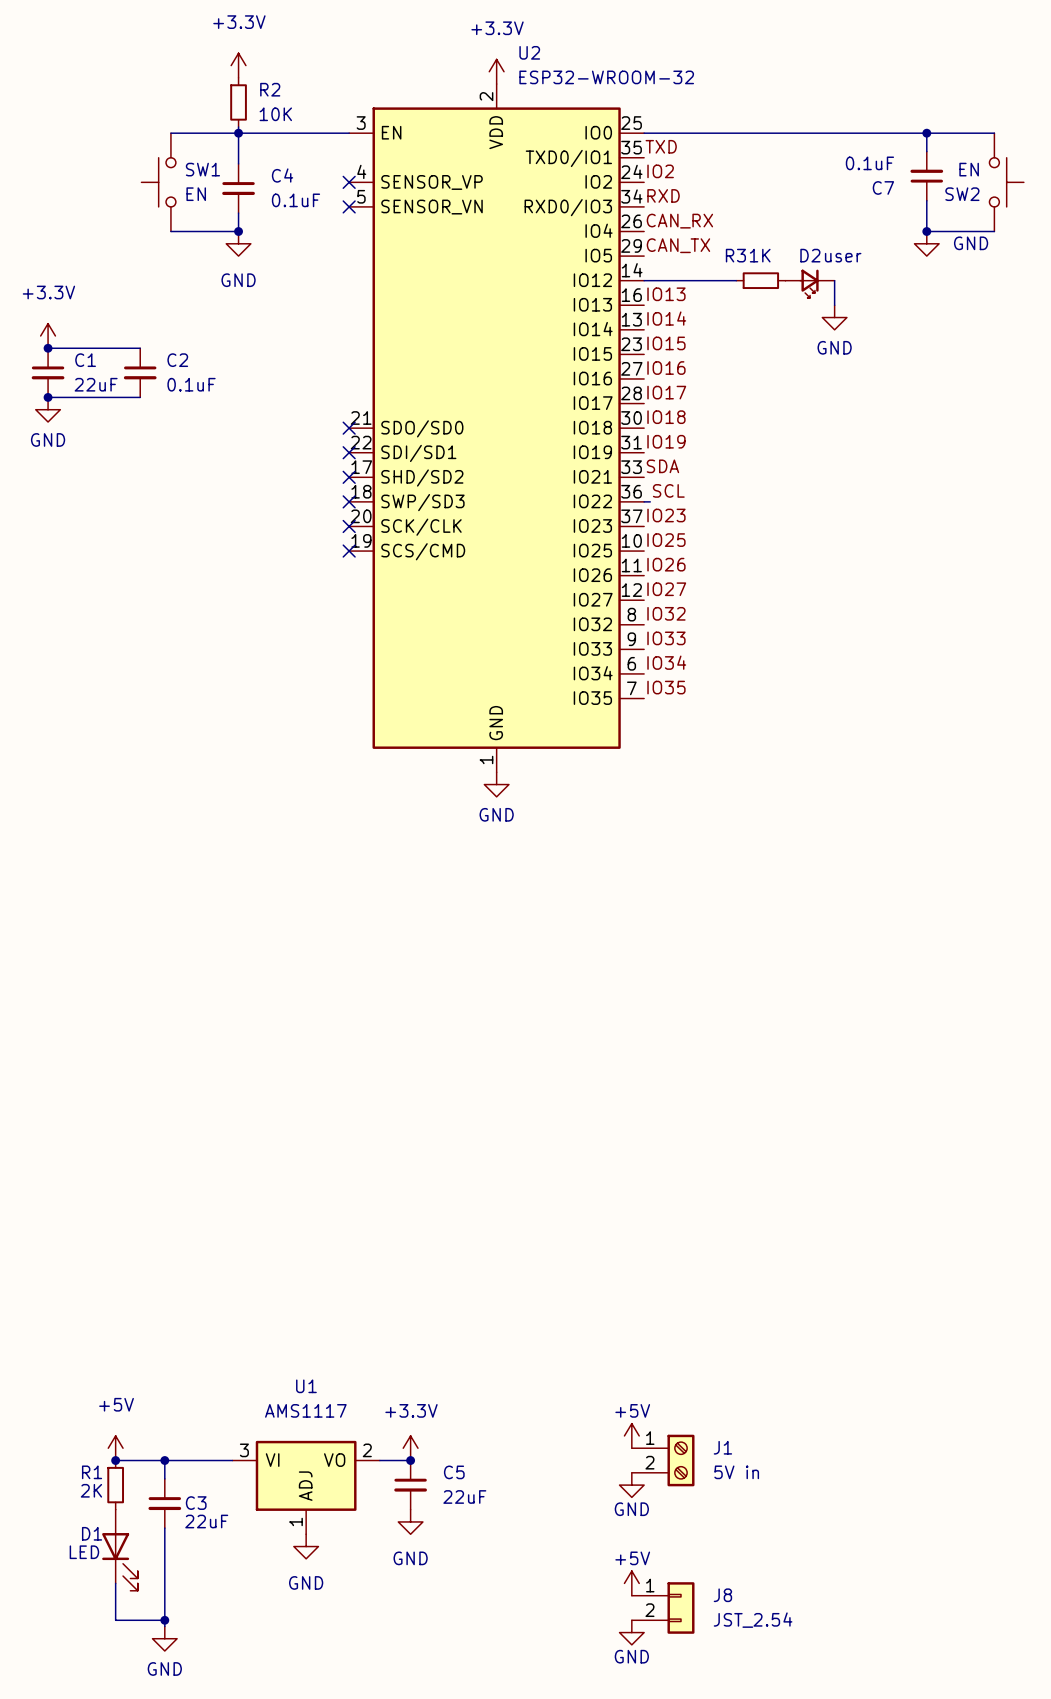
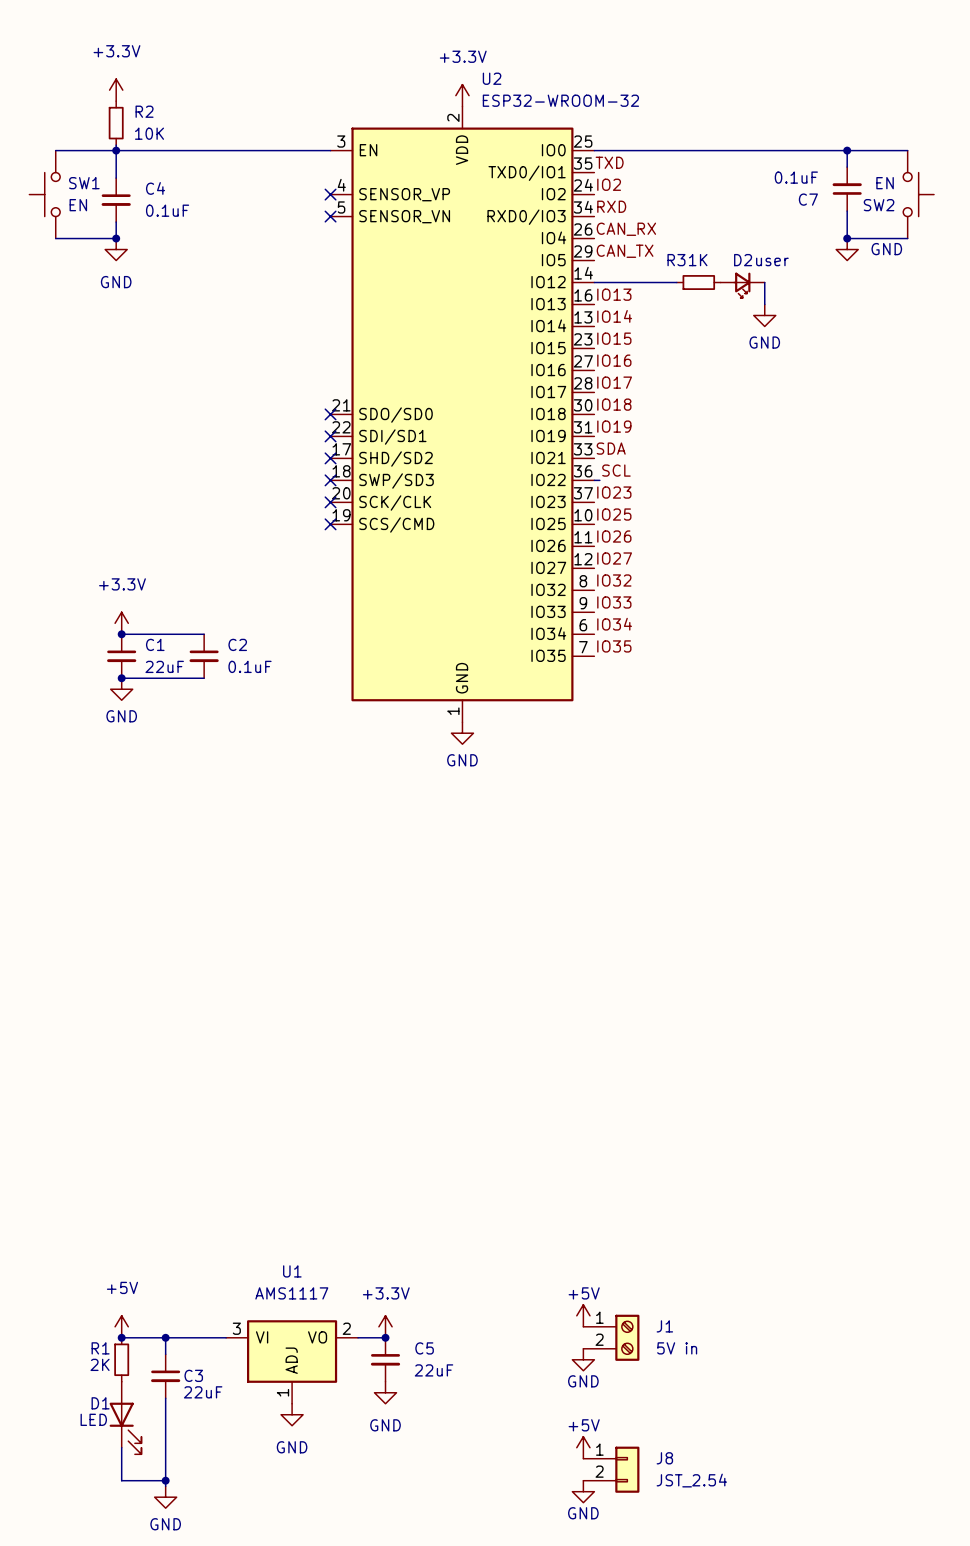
power symbol position: +3.3V (238, 65) -> +3.3V (116, 90)
R2 position: (238, 102) -> (116, 123)
wire: (238, 127) (238, 163) -> (116, 145) (116, 178)
wire: none -> (55, 150) (171, 150)
junction: none -> (116, 150)
junction: (238, 133) -> none
SW1 position: (158, 182) -> (44, 194)
C4 position: (238, 188) -> (116, 200)
wire: (238, 213) (238, 231) (170, 231) -> (116, 222) (116, 238) (55, 238)
junction: none -> (116, 238)
junction: (238, 231) -> none
power symbol: none -> GND (116, 249)
power symbol: GND (238, 243) -> none
power symbol: +3.3V (48, 335) -> none
wire: (48, 348) (140, 348) -> none
junction: (48, 348) -> none
C1 position: (48, 372) -> (121, 656)
C2 position: (140, 372) -> (204, 656)
wire: (48, 397) (140, 397) -> none
junction: (48, 397) -> none
power symbol: GND (48, 409) -> none
power symbol: none -> +3.3V (121, 623)
wire: none -> (121, 634) (204, 634)
junction: none -> (121, 634)
wire: none -> (121, 678) (204, 678)
junction: none -> (121, 678)
power symbol: none -> GND (121, 689)

